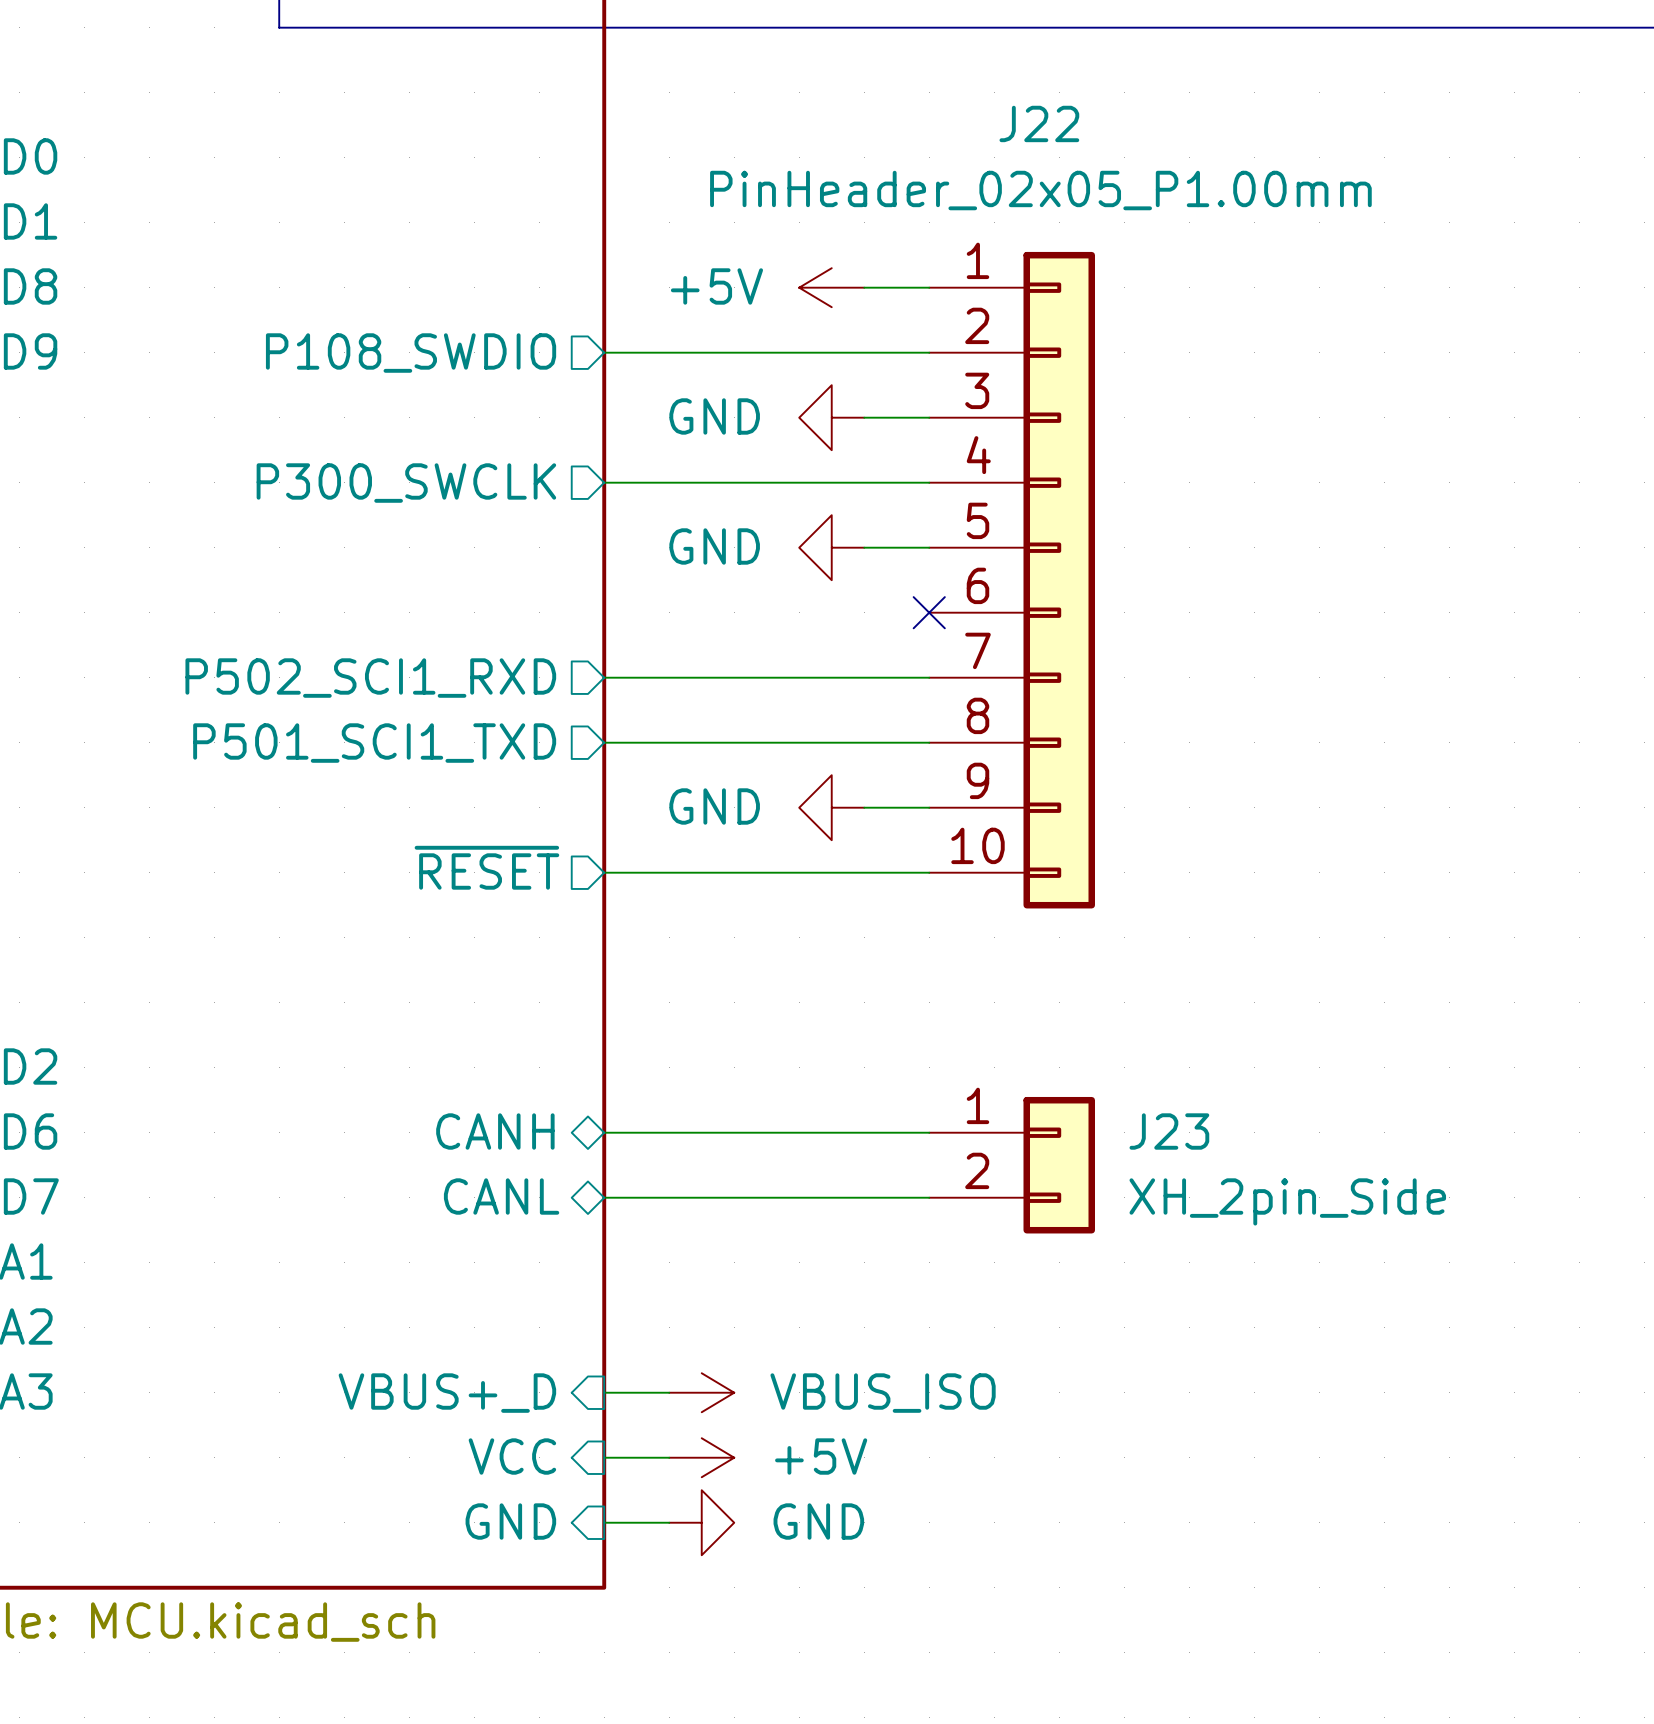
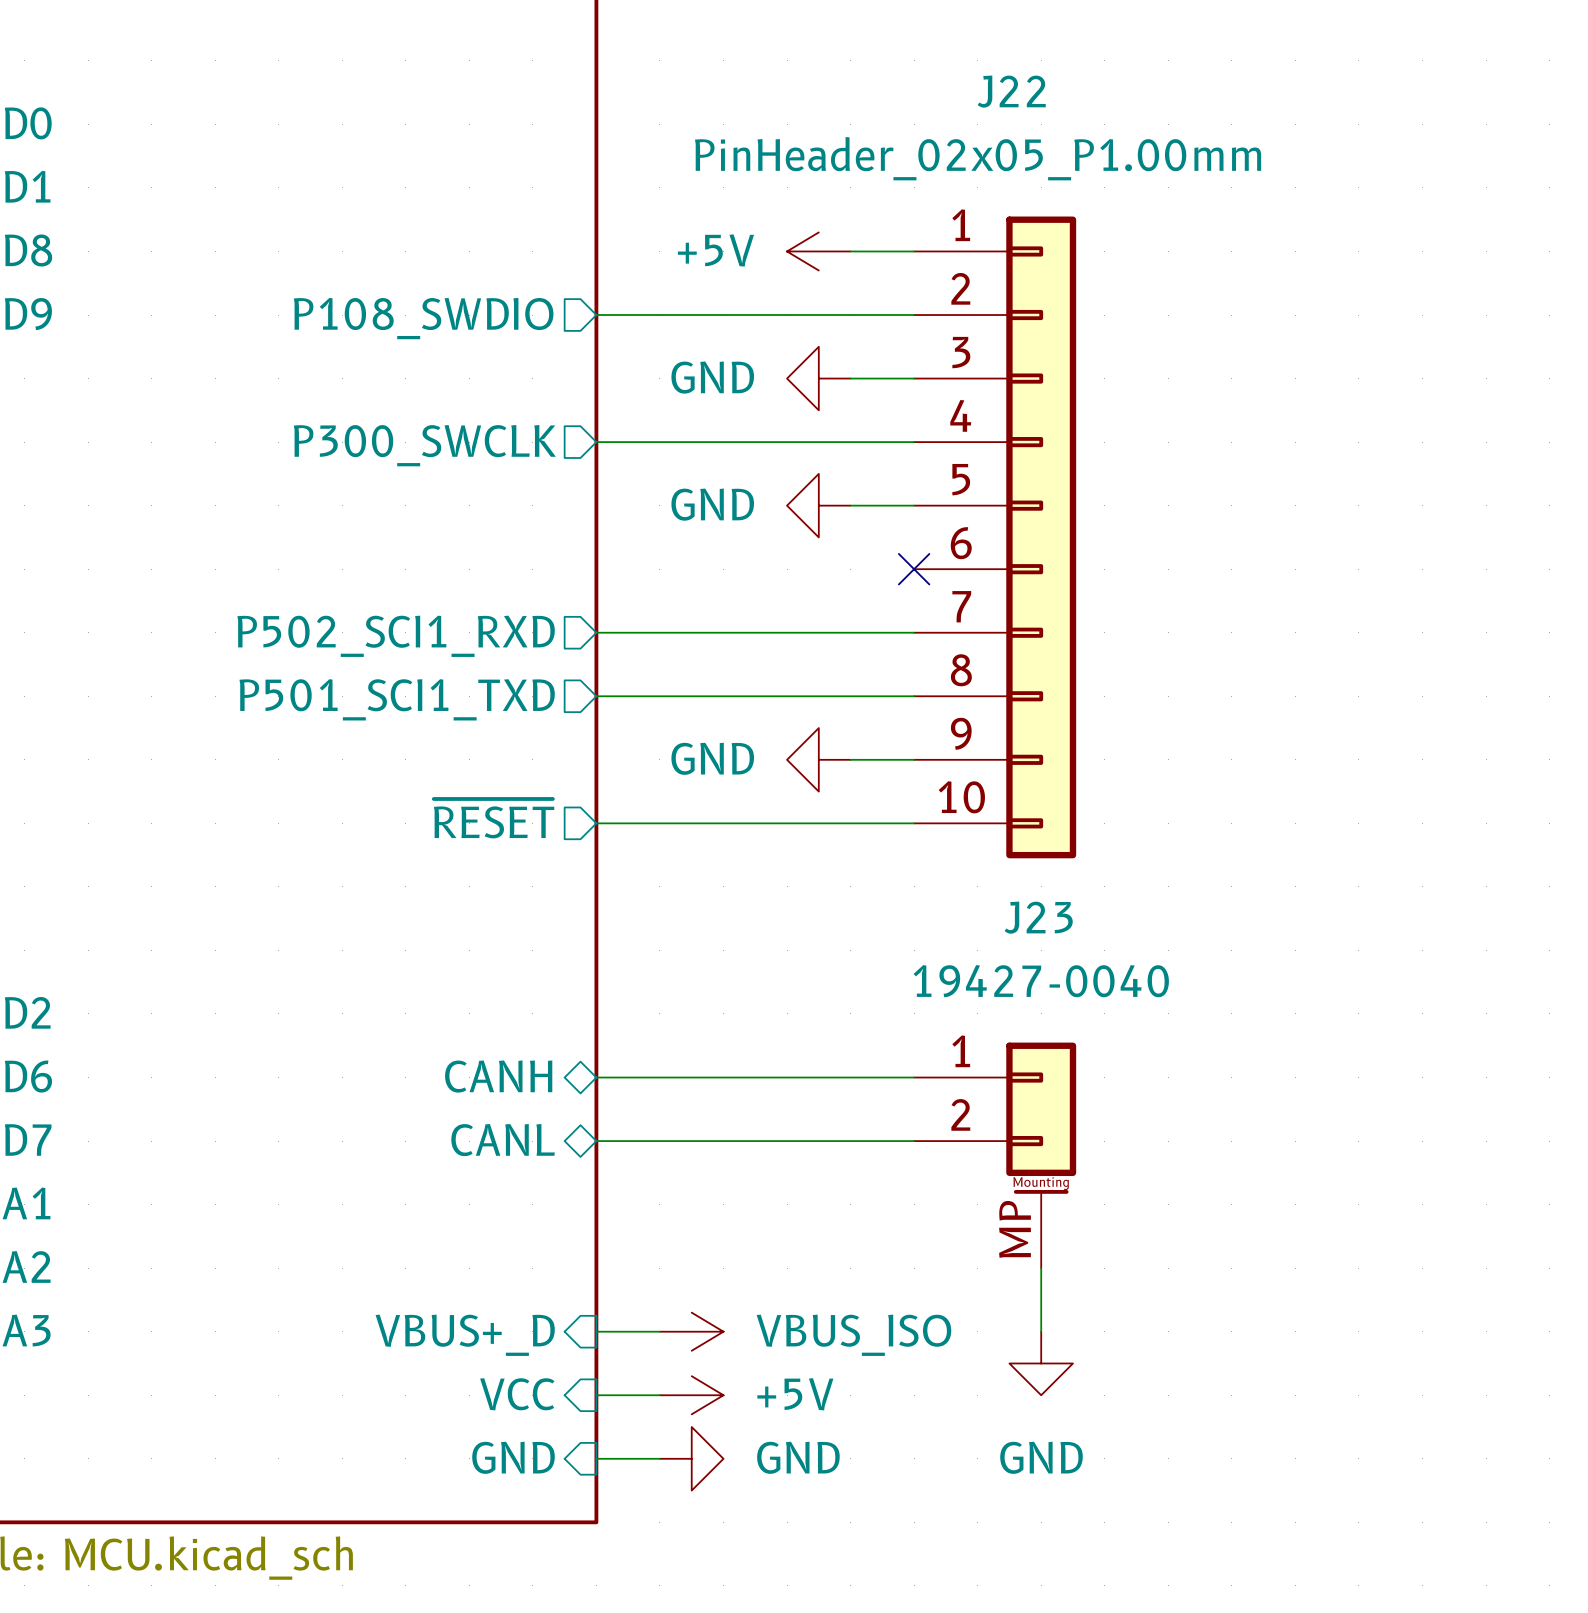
J23 symbol: [929, 1096, 1096, 1234] -> [914, 1042, 1077, 1269]
J23 name position: J23 (1169, 1131) -> J23 (1038, 917)
J23 value: XH_2pin_Side (1287, 1201) -> 19427-0040 (1041, 981)
wire: none -> (1041, 1268) (1041, 1331)
power symbol: none -> GND (1041, 1363)

